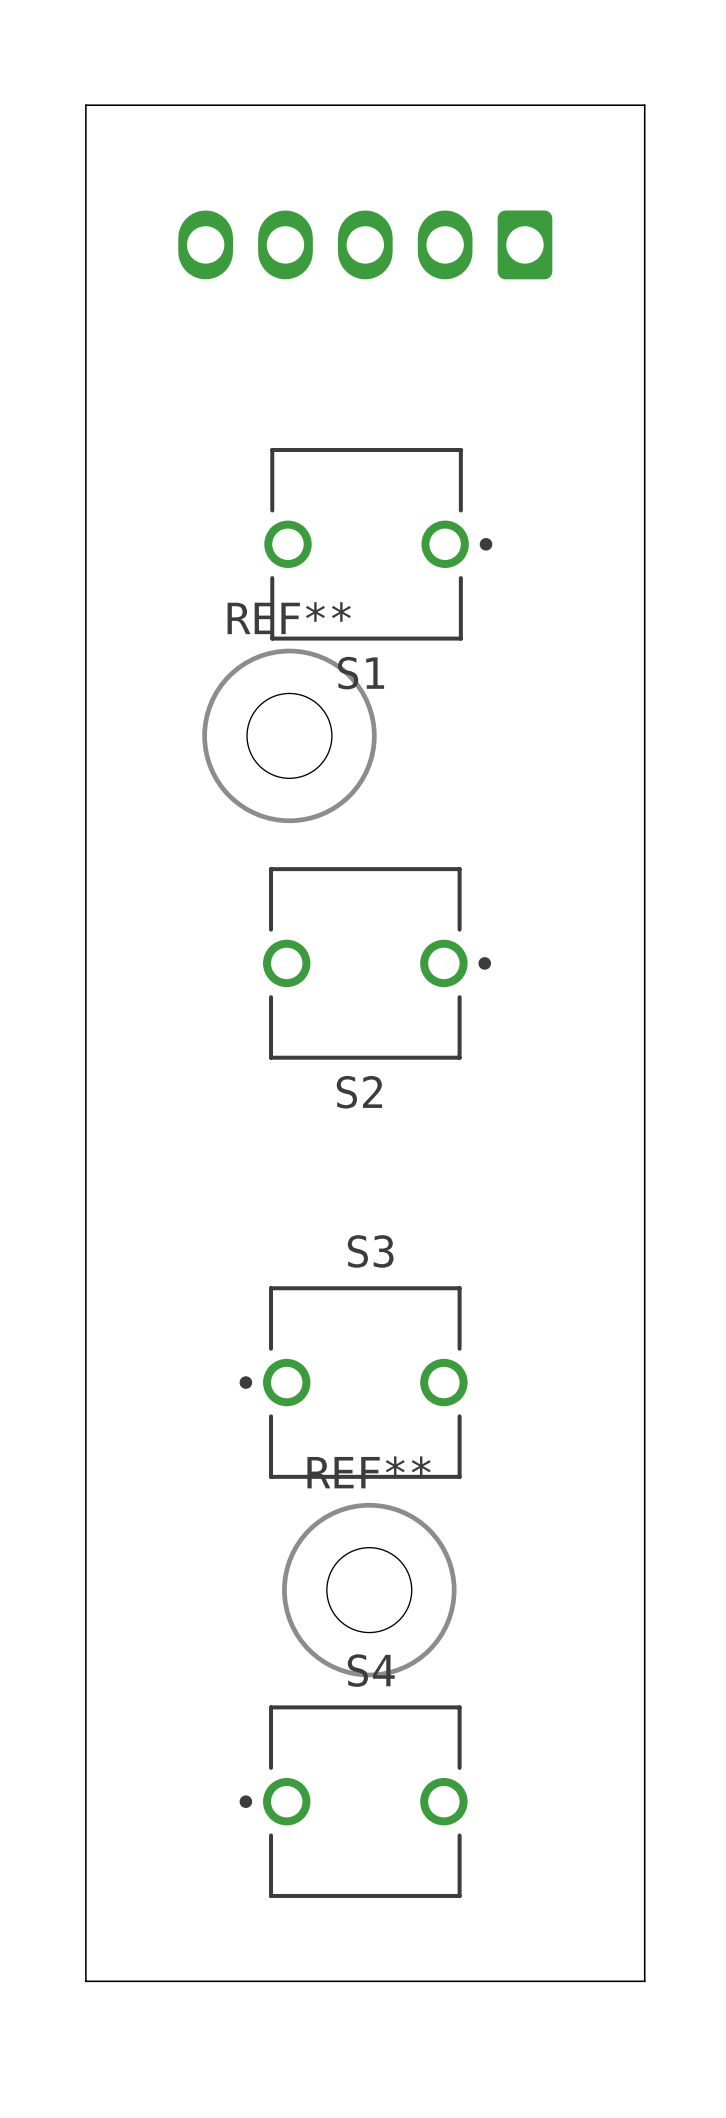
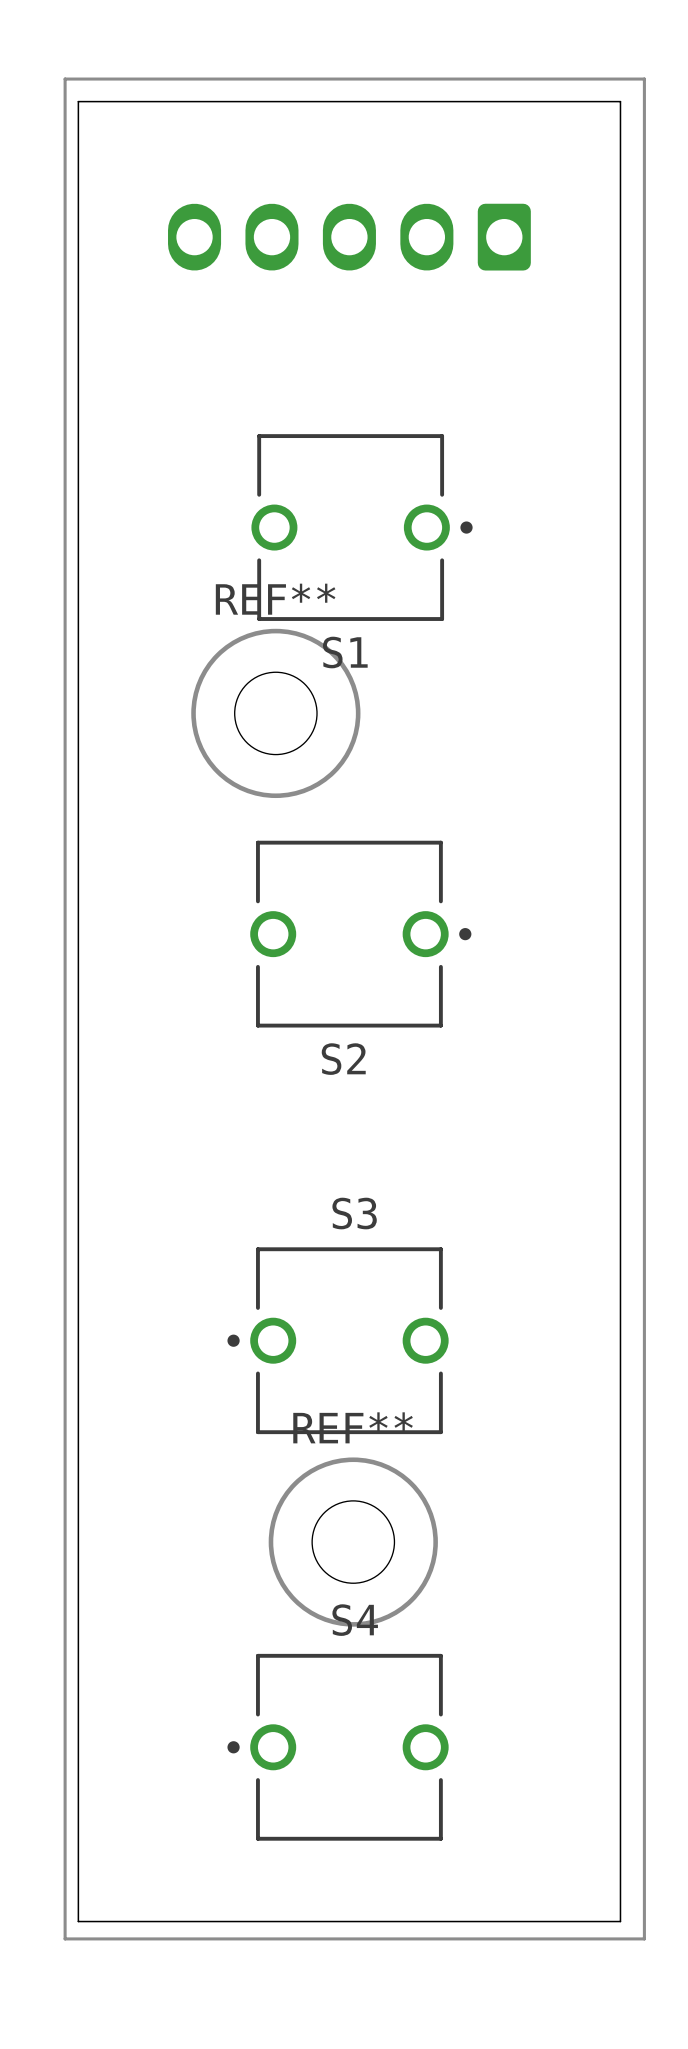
line: none -> (65, 79) (644, 79) (644, 1938) (65, 1938) (65, 79)

